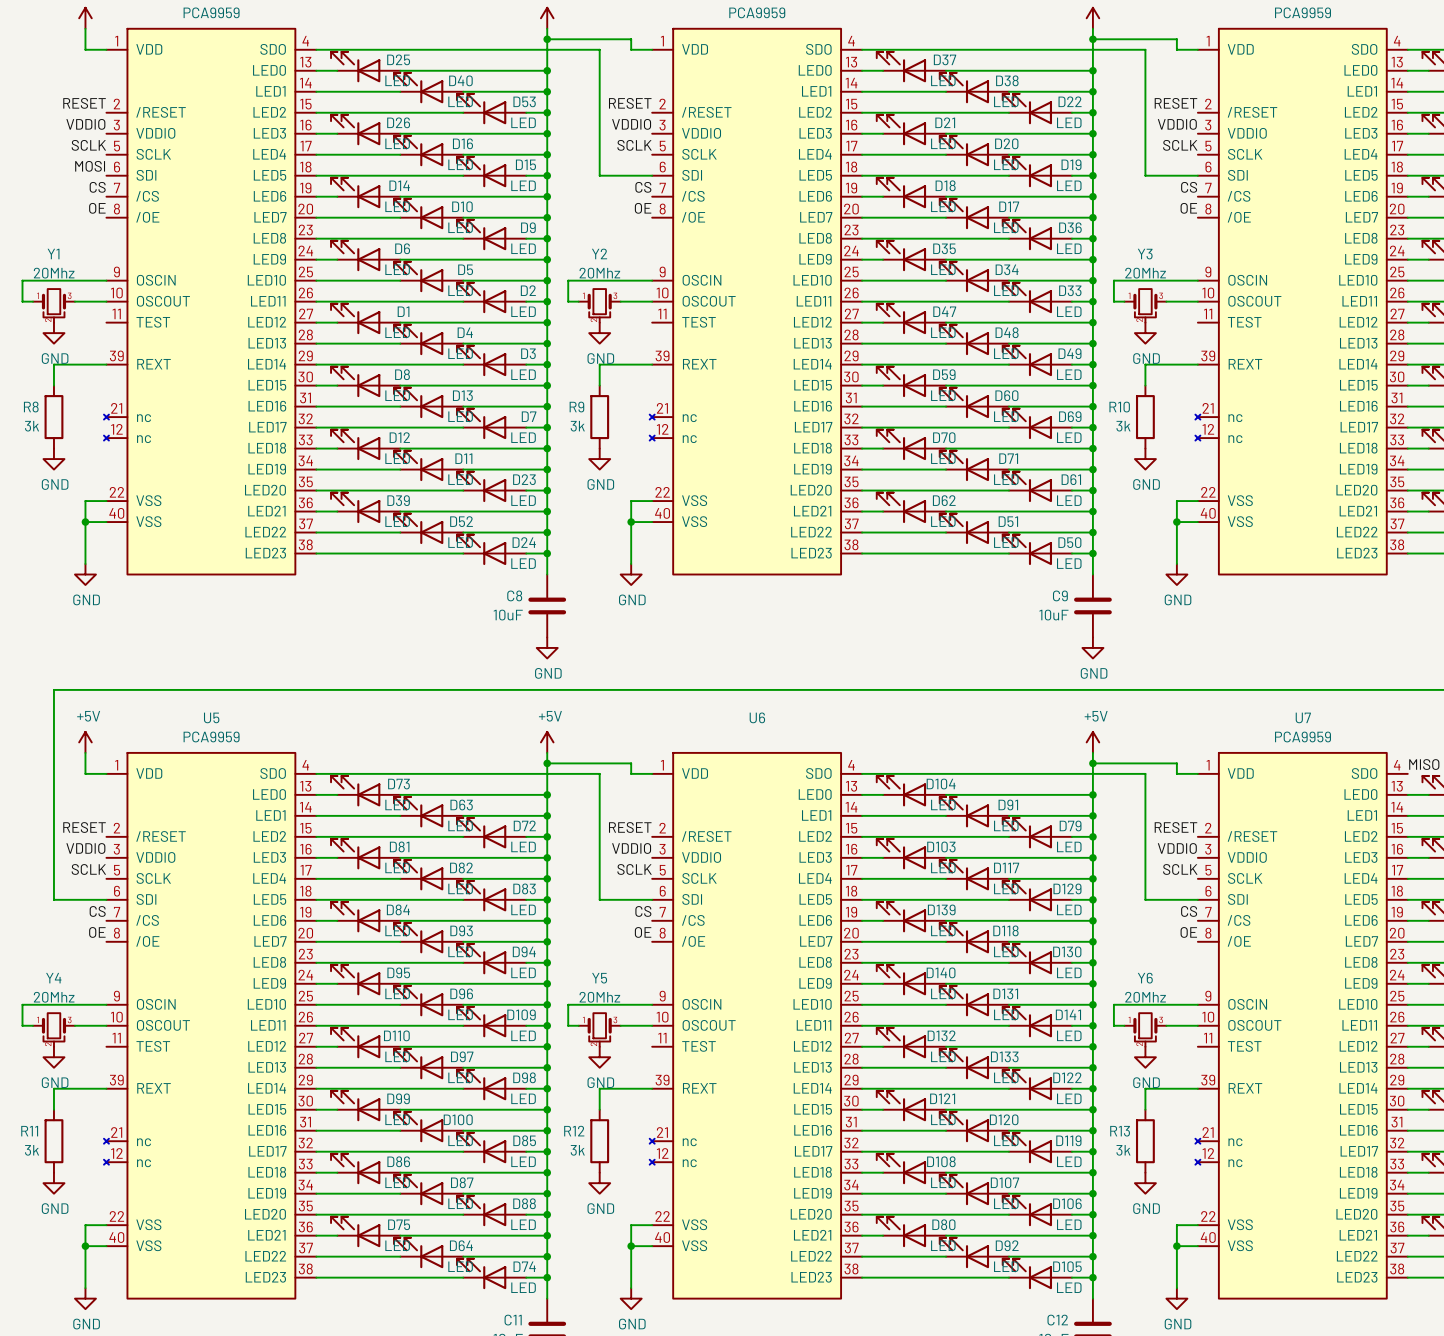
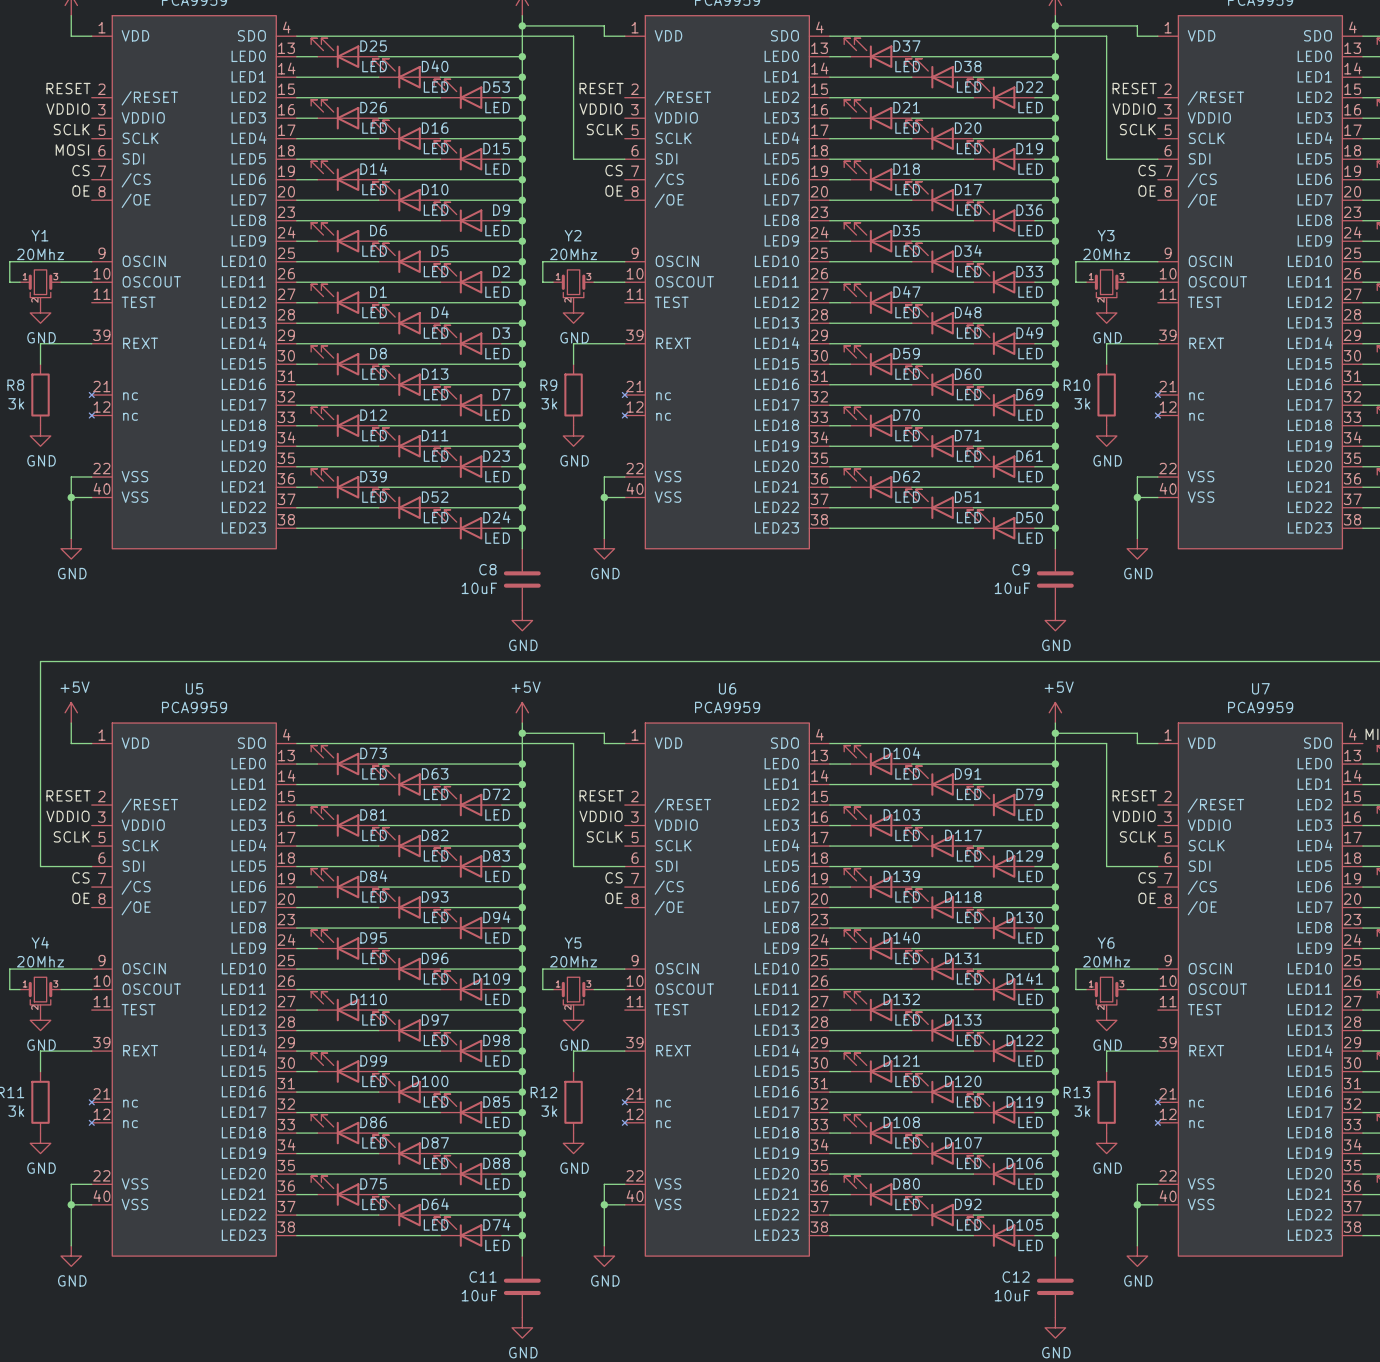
U6 value: none -> PCA9959 (727, 707)

